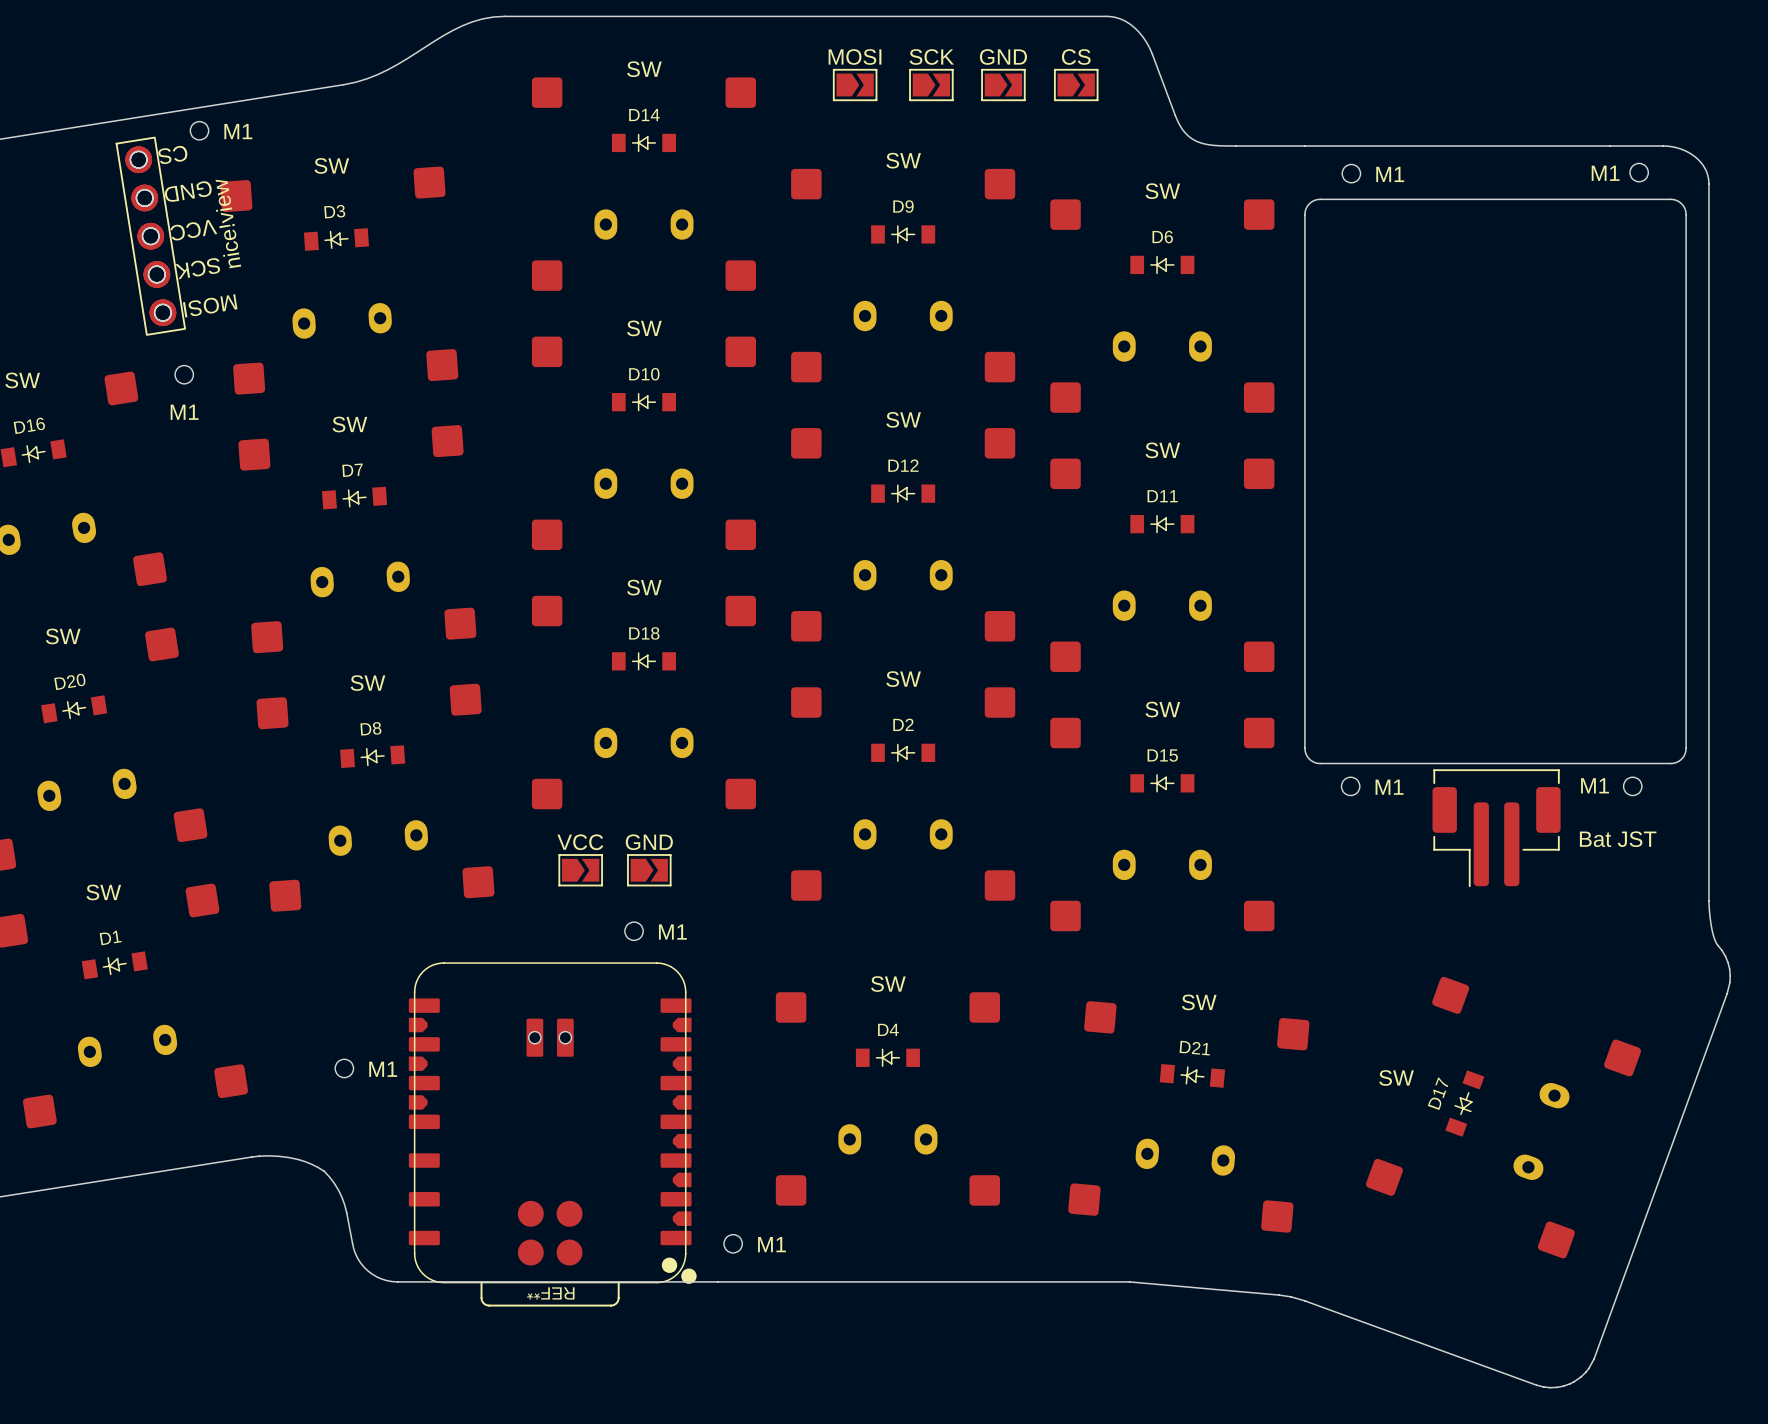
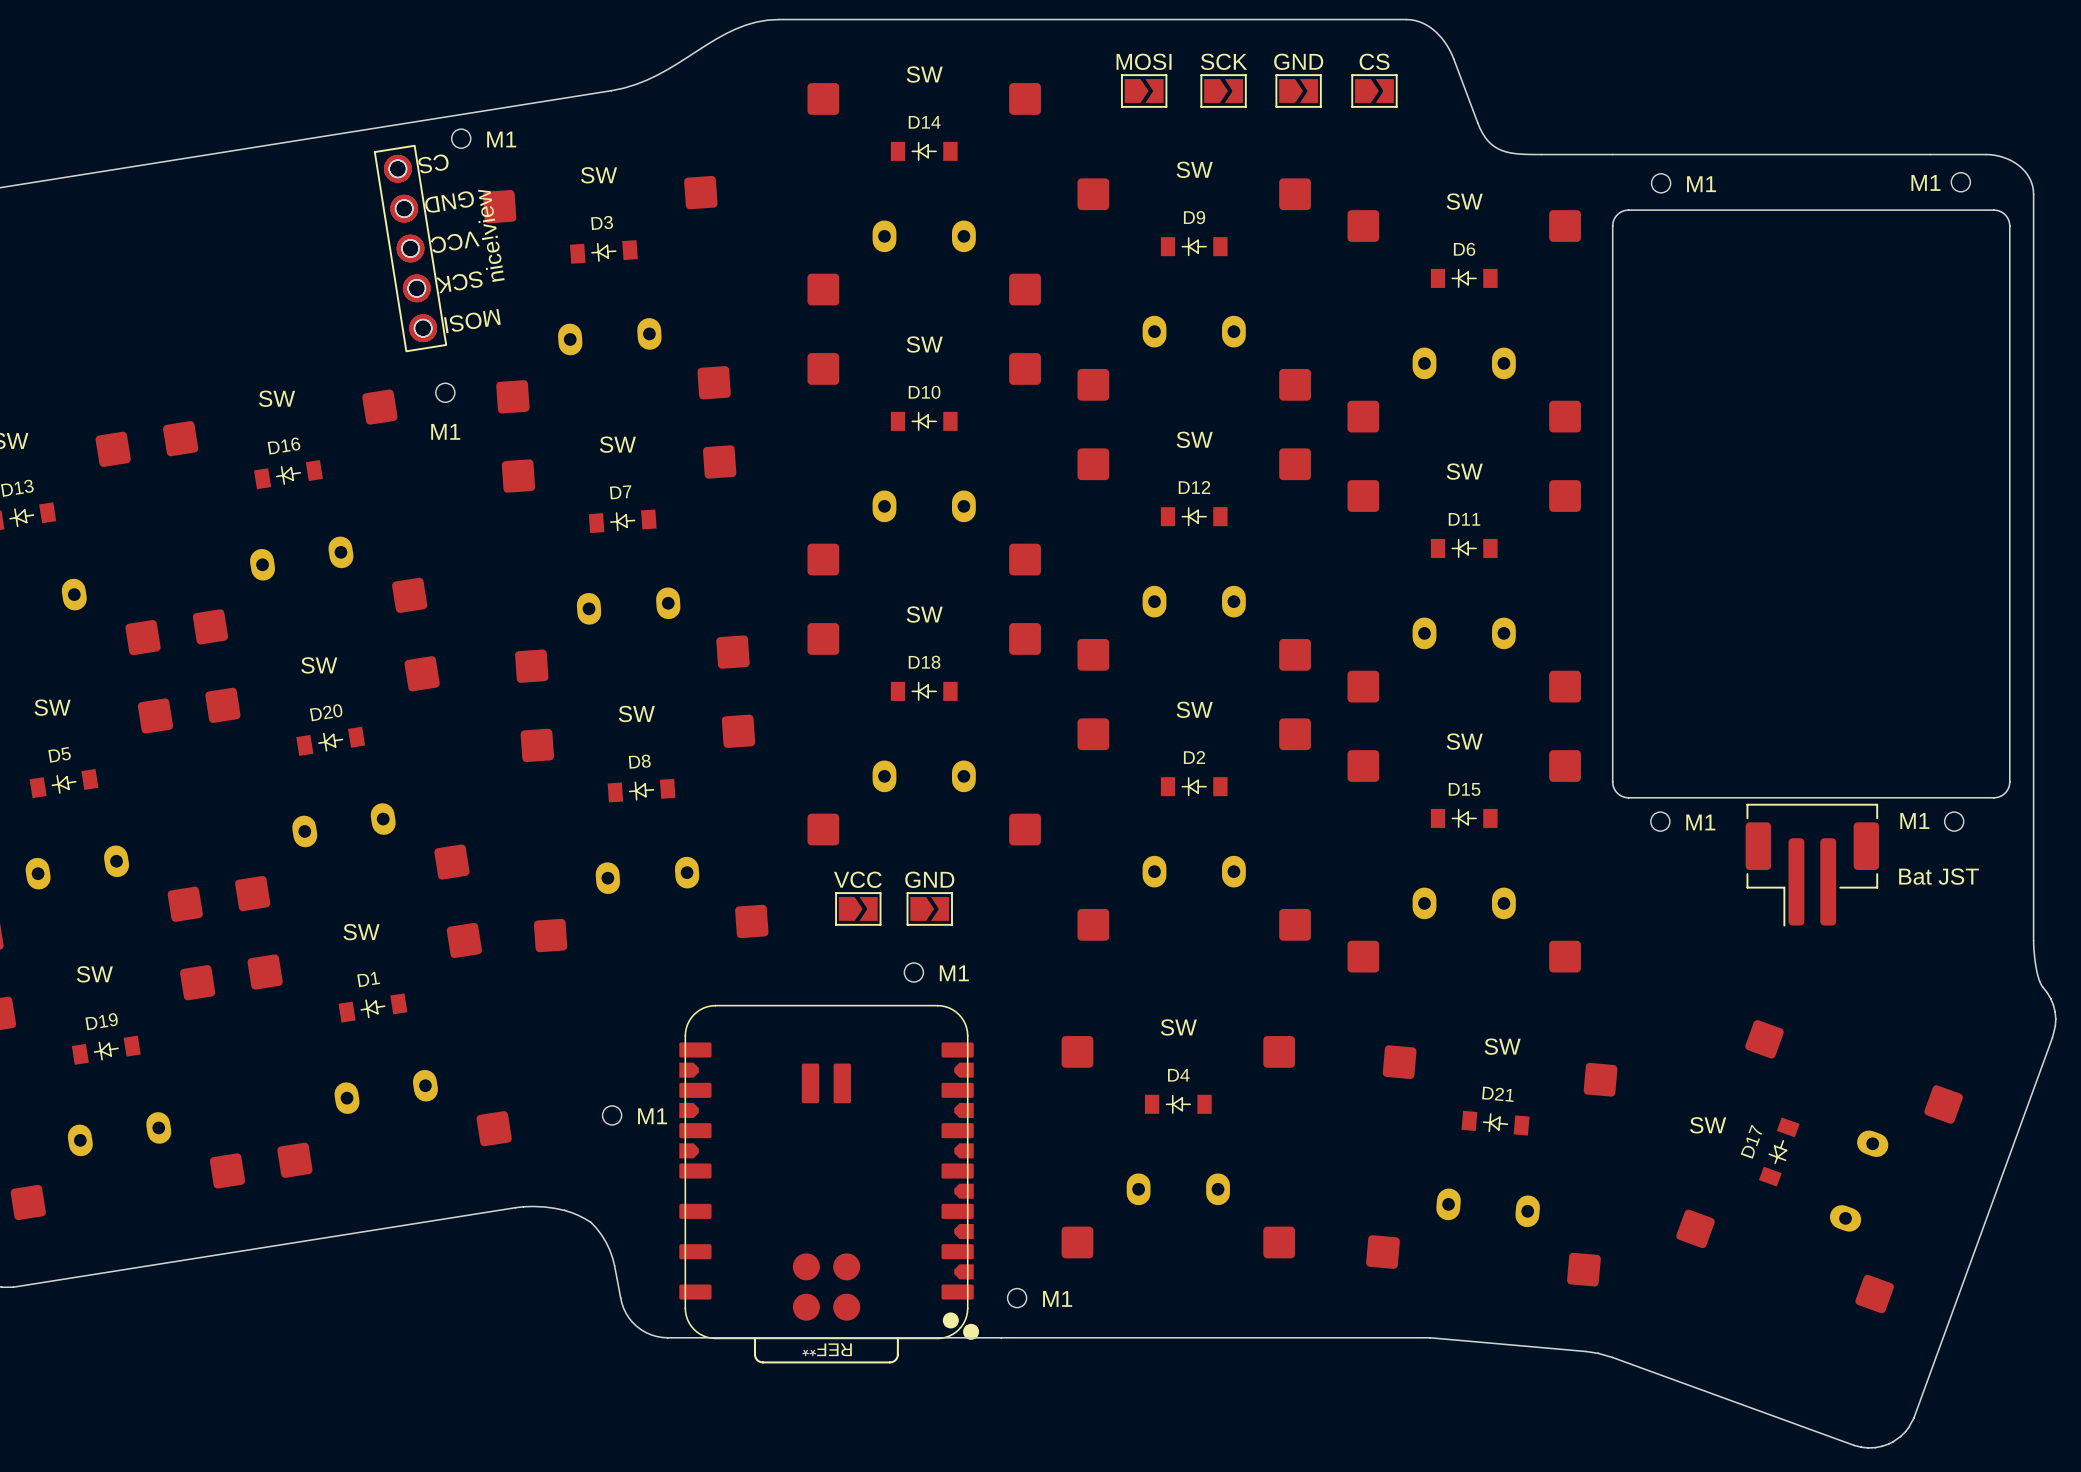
REF** footprint: [408, 962, 697, 1307] -> [679, 1004, 980, 1364]

